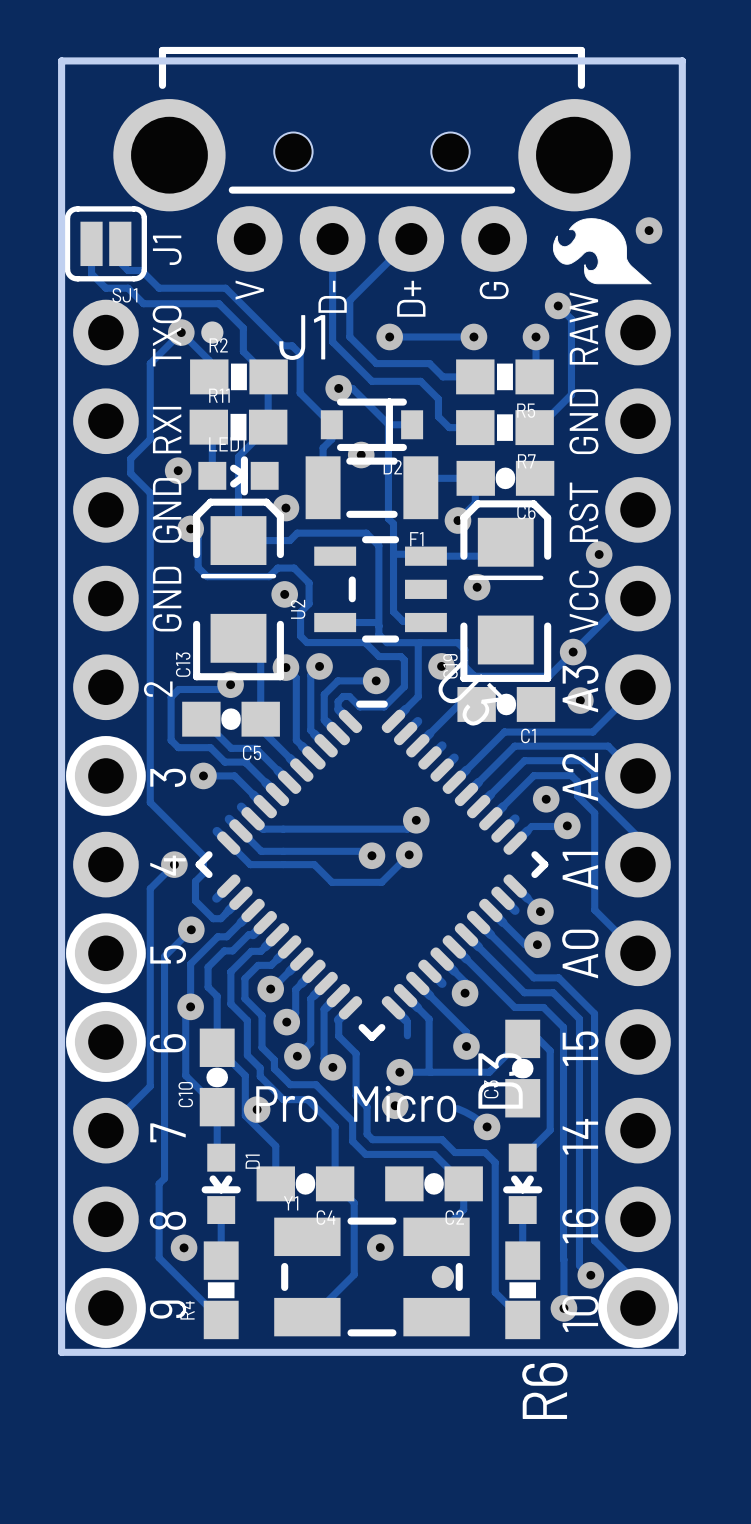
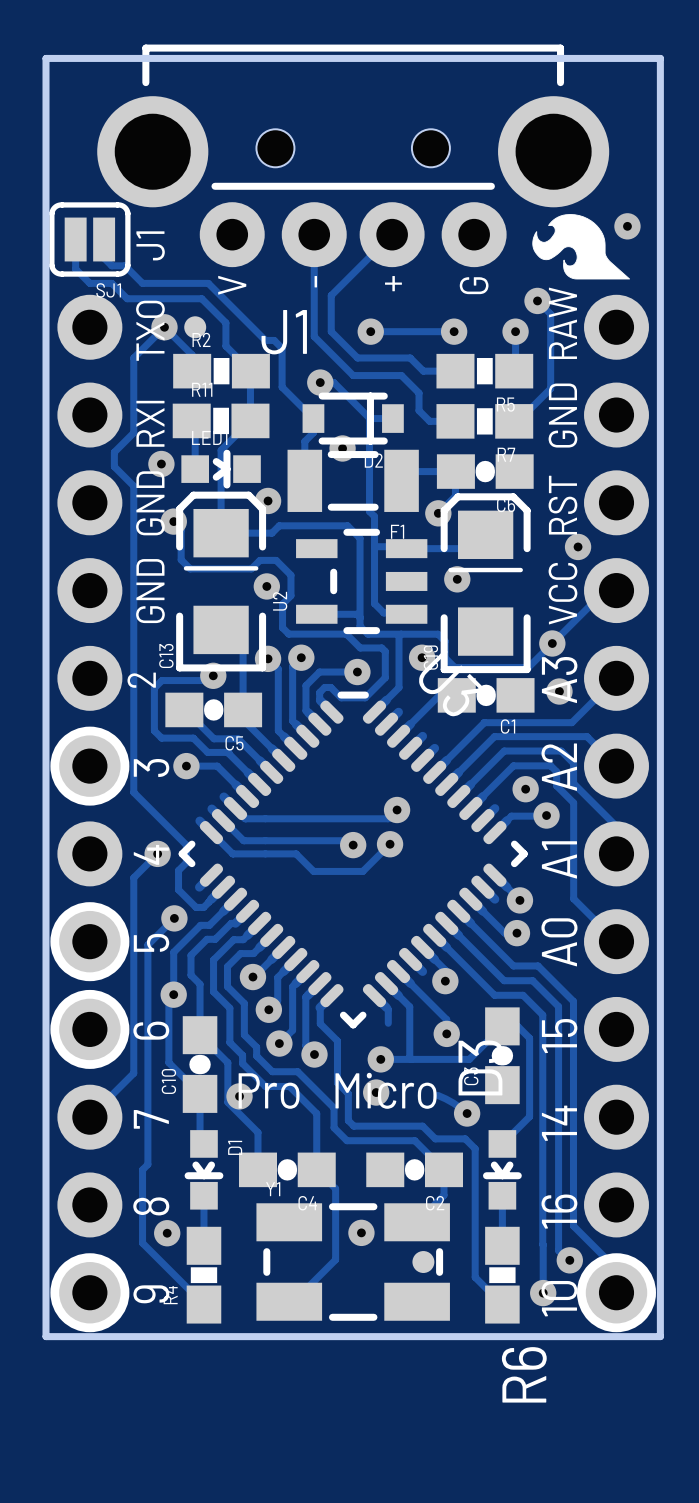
text: D- (332, 296) -> - (315, 281)
text: D+ (411, 298) -> + (393, 283)

